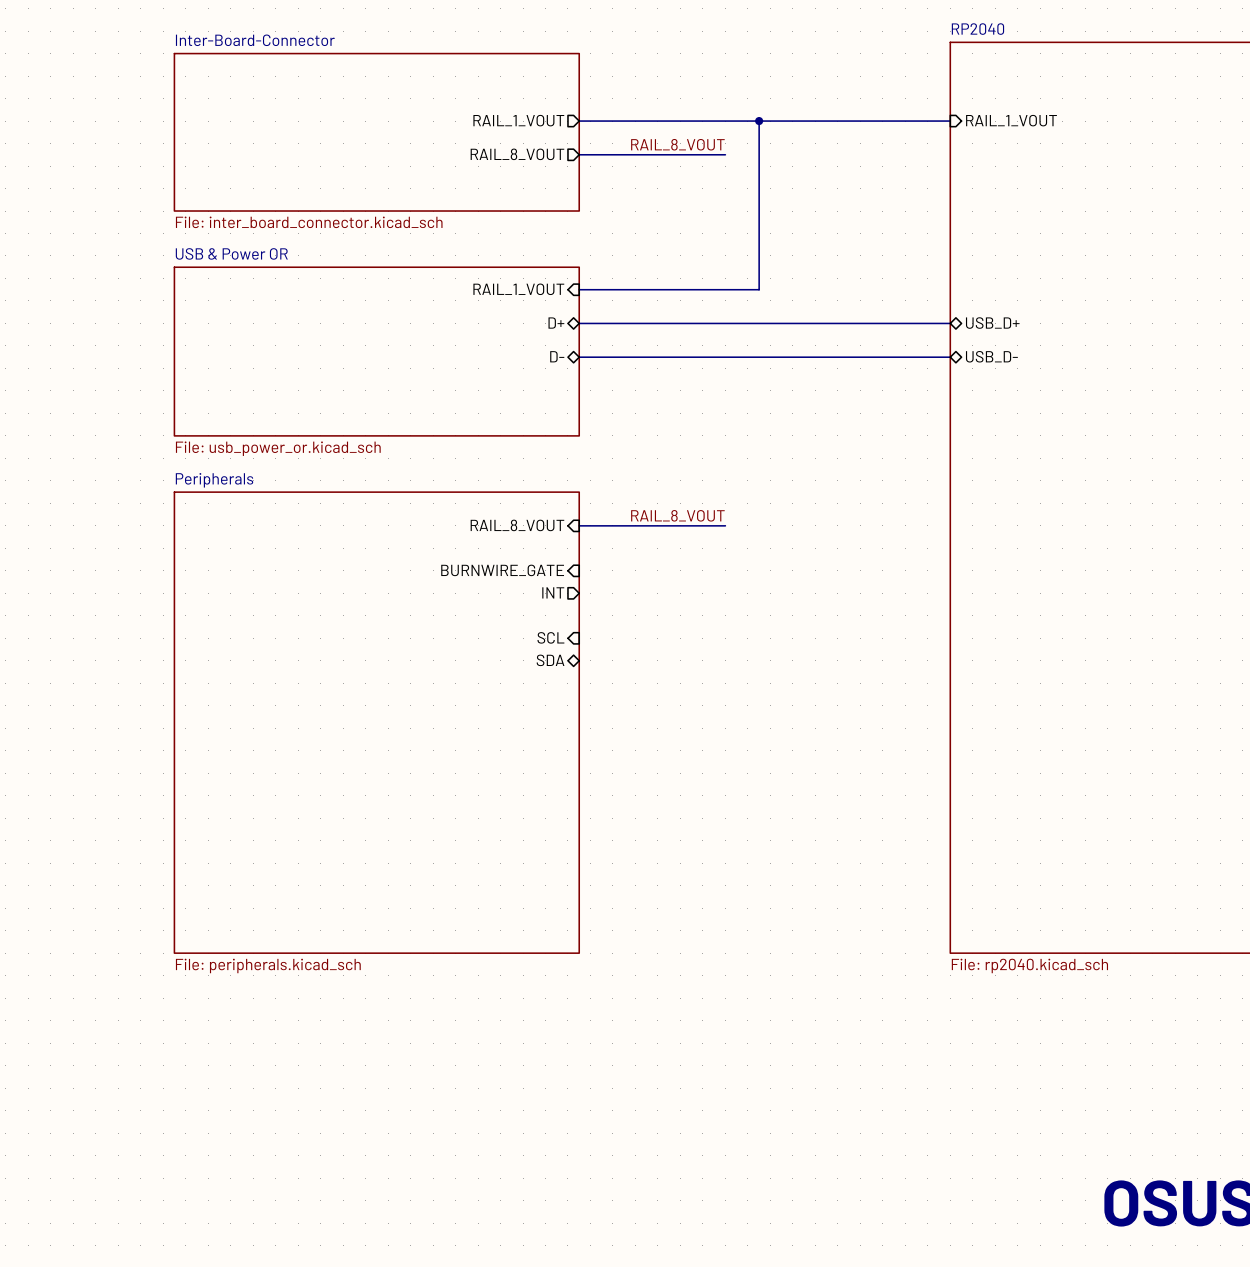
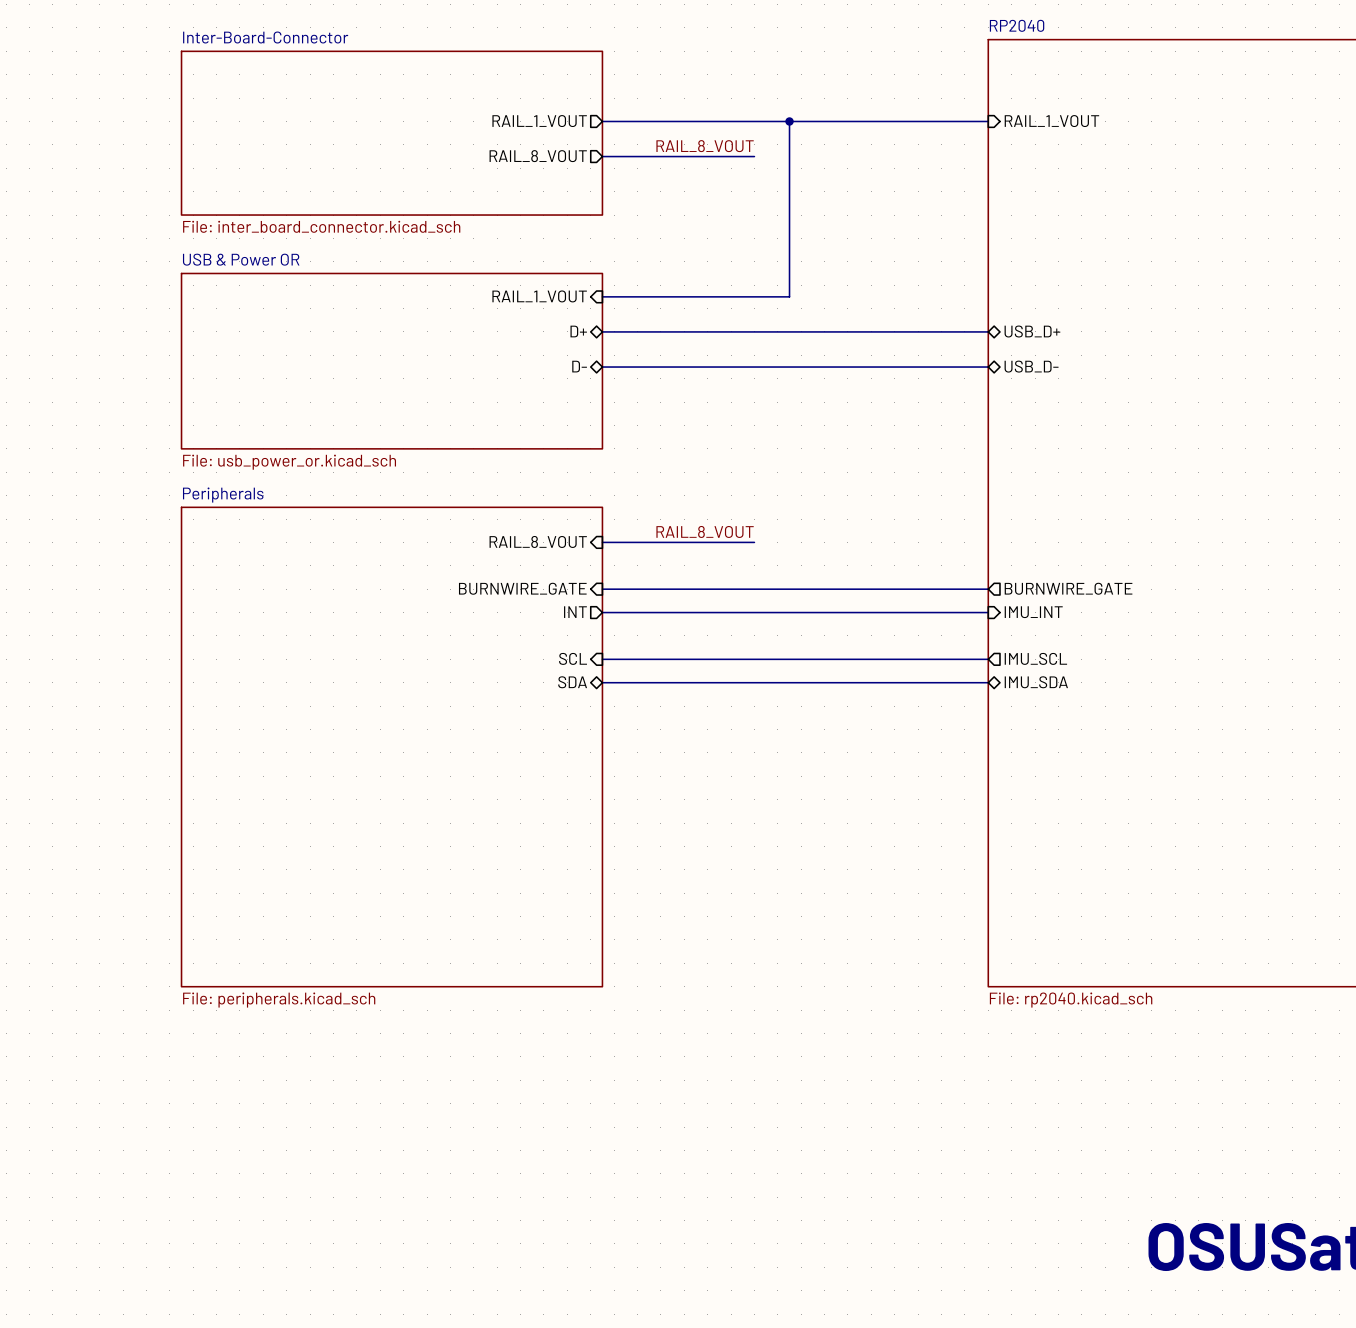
wire: none -> (602, 589) (988, 589)
sheet pin: none -> BURNWIRE_GATE (1068, 588)
sheet pin: none -> IMU_INT (1033, 612)
wire: none -> (602, 612) (988, 612)
sheet pin: none -> IMU_SCL (1035, 658)
wire: none -> (602, 659) (988, 659)
wire: none -> (602, 682) (988, 682)
sheet pin: none -> IMU_SDA (1036, 682)

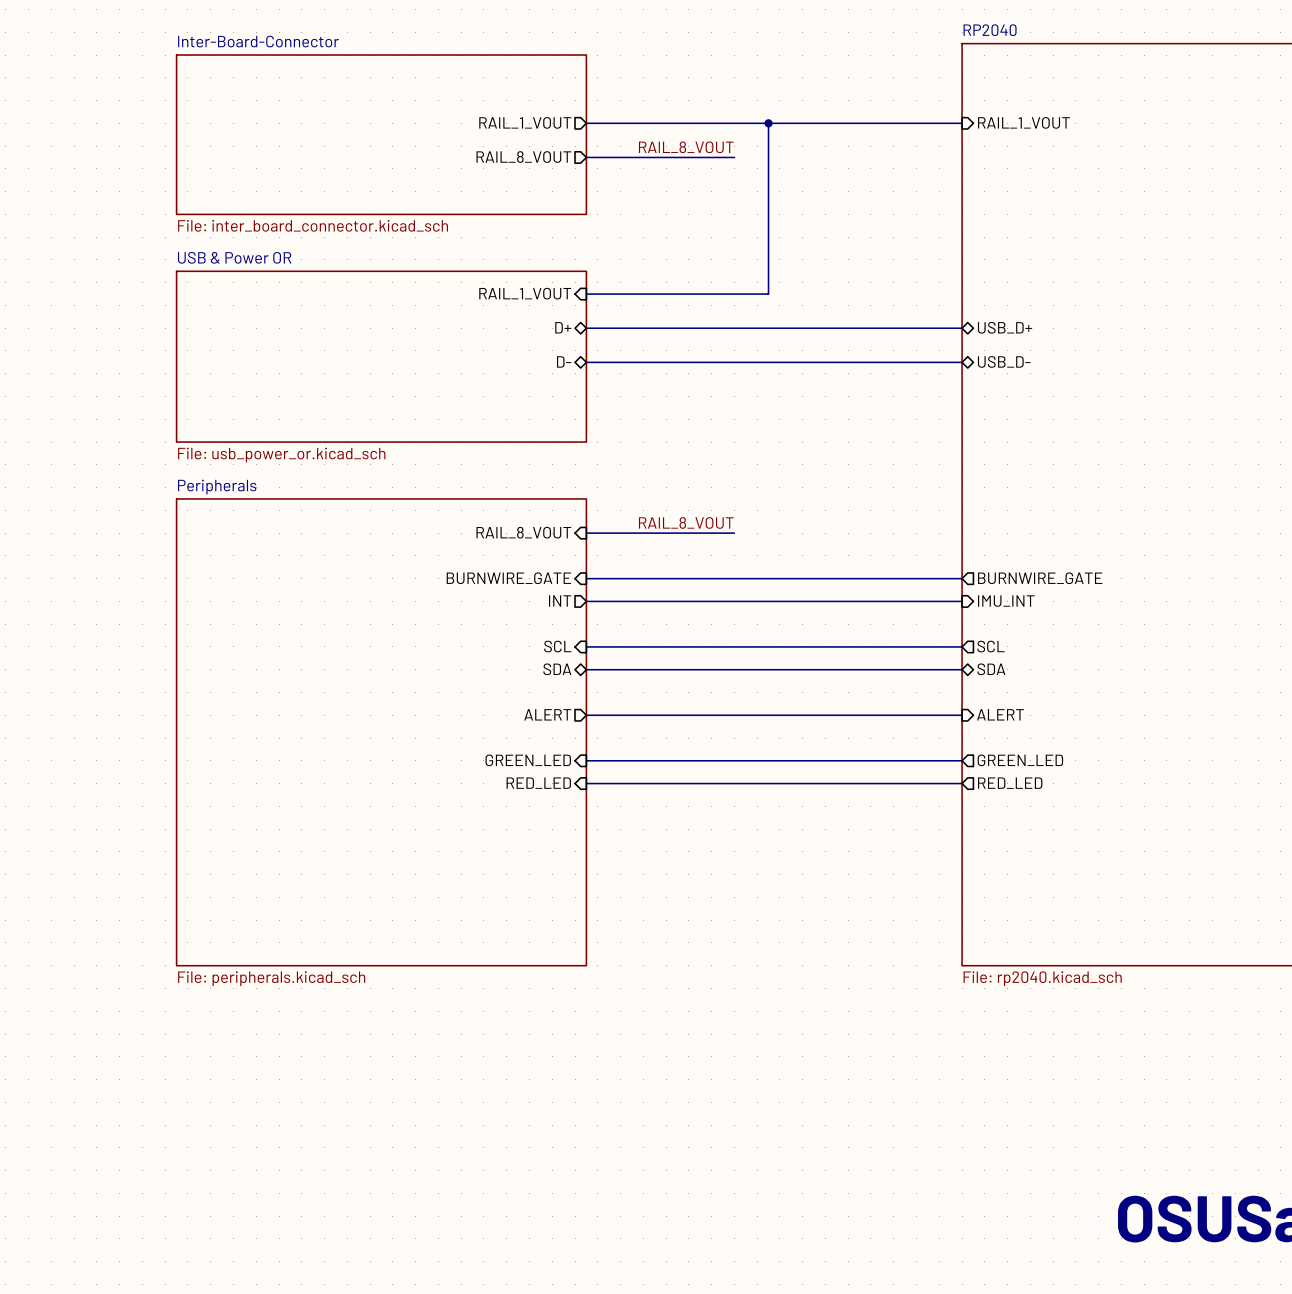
sheet pin: IMU_SCL (1035, 658) -> SCL (990, 646)
sheet pin: IMU_SDA (1036, 682) -> SDA (991, 669)
sheet pin: none -> ALERT (547, 714)
wire: none -> (586, 715) (962, 715)
sheet pin: none -> ALERT (1000, 714)
sheet pin: none -> GREEN_LED (528, 760)
sheet pin: none -> GREEN_LED (1020, 760)
wire: none -> (586, 760) (962, 760)
sheet pin: none -> RED_LED (538, 783)
wire: none -> (586, 783) (962, 783)
sheet pin: none -> RED_LED (1010, 783)

